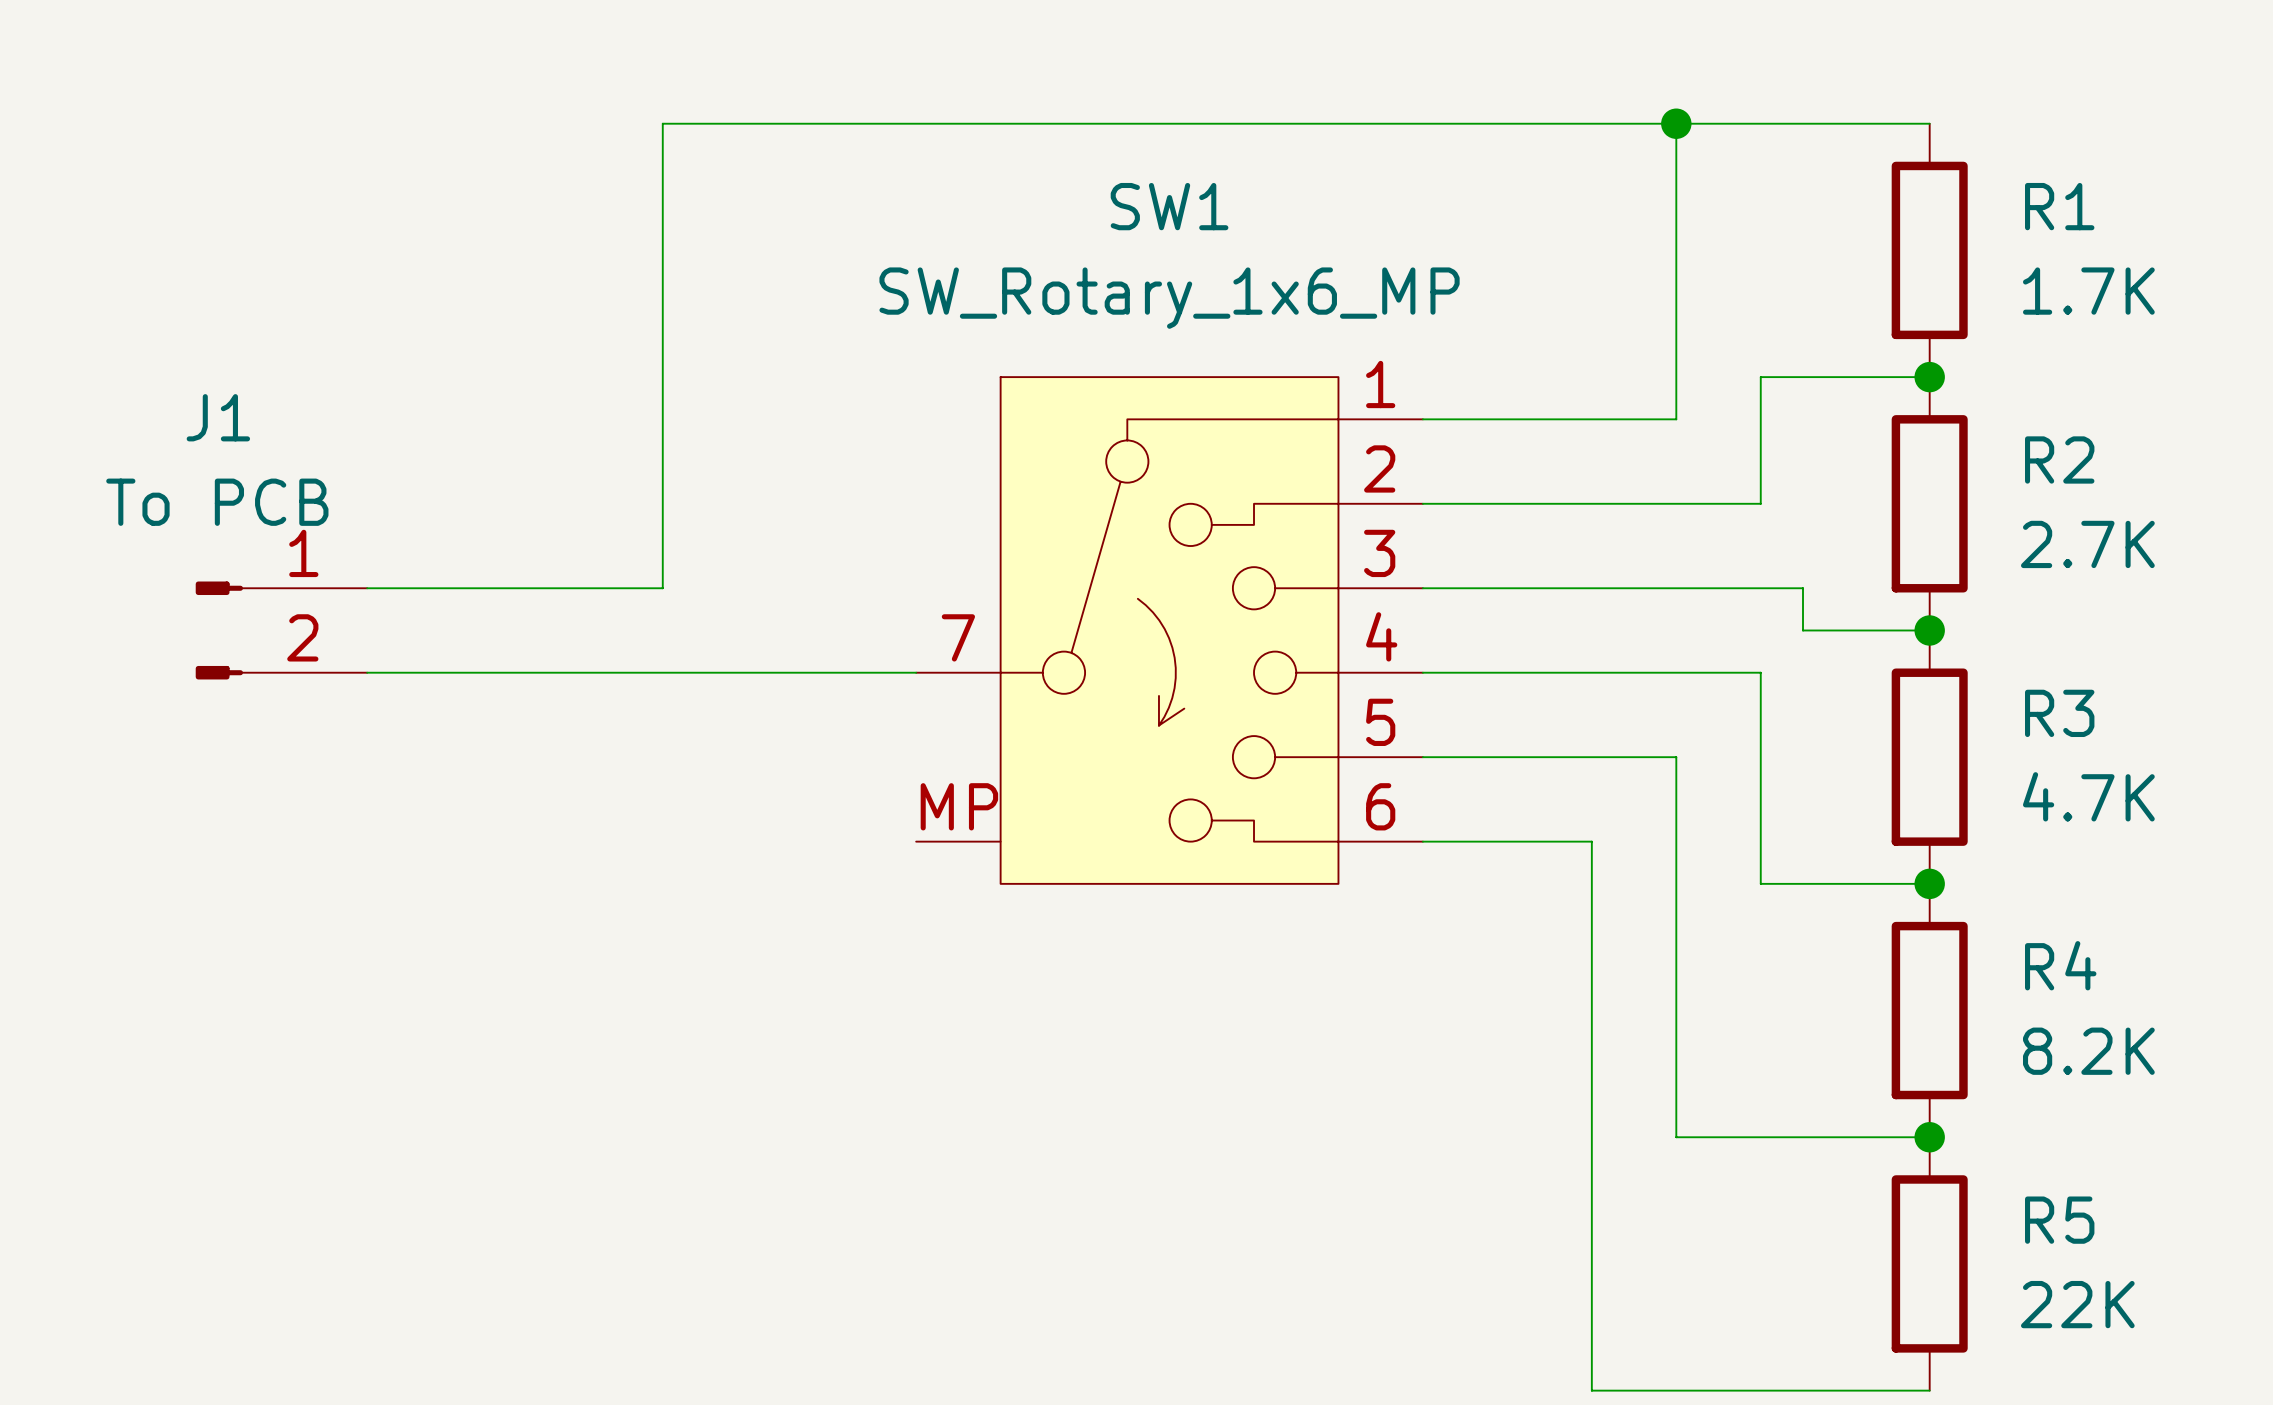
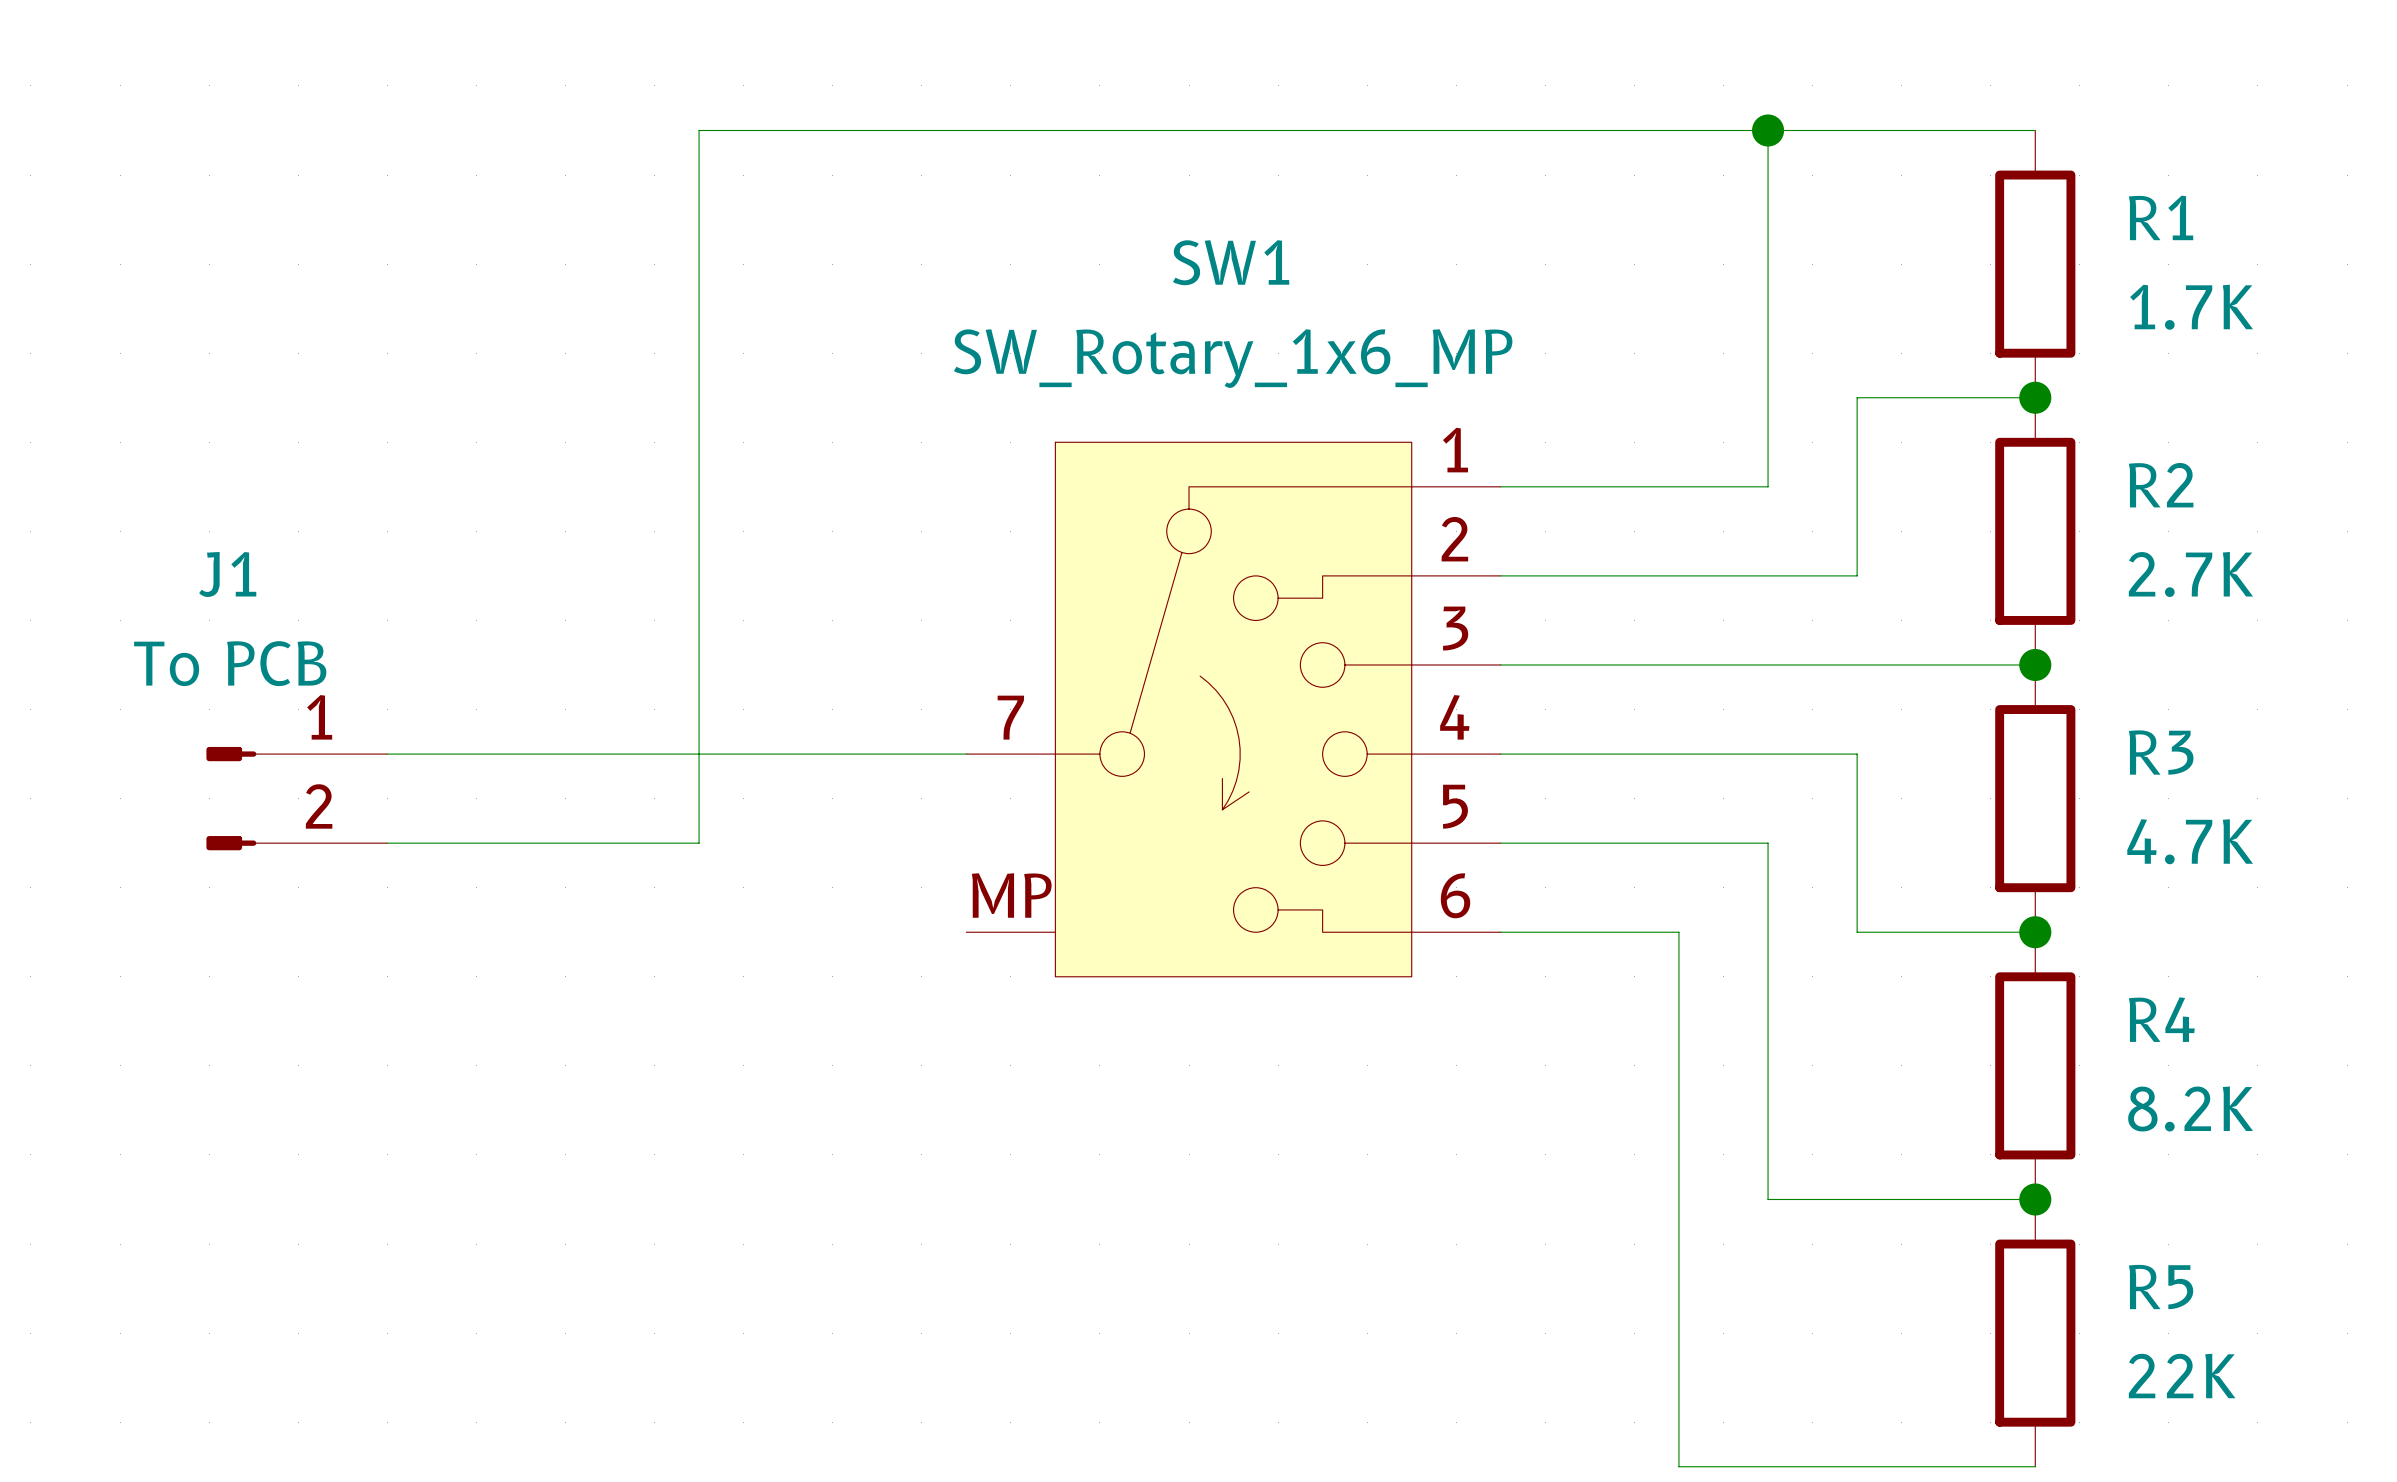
wire: (1422, 419) (1676, 419) -> (1500, 486) (1768, 486) (1768, 442)
wire: (1422, 503) (1760, 503) -> (1500, 575) (1857, 575) (1857, 531)
wire: (367, 588) (662, 588) -> (387, 843) (699, 843) (699, 620)
wire: (1422, 588) (1803, 588) (1803, 630) -> (1500, 664) (1901, 664)
J1 position: (281, 630) -> (296, 798)
SW1 position: (1169, 630) -> (1233, 709)
wire: (367, 672) (916, 672) -> (387, 754) (966, 754)
wire: (1422, 672) (1760, 672) (1760, 714) -> (1500, 754) (1857, 754)
wire: (1422, 757) (1676, 757) (1676, 799) -> (1500, 843) (1768, 843)
wire: (1422, 841) (1591, 841) (1591, 883) -> (1500, 932) (1678, 932)

